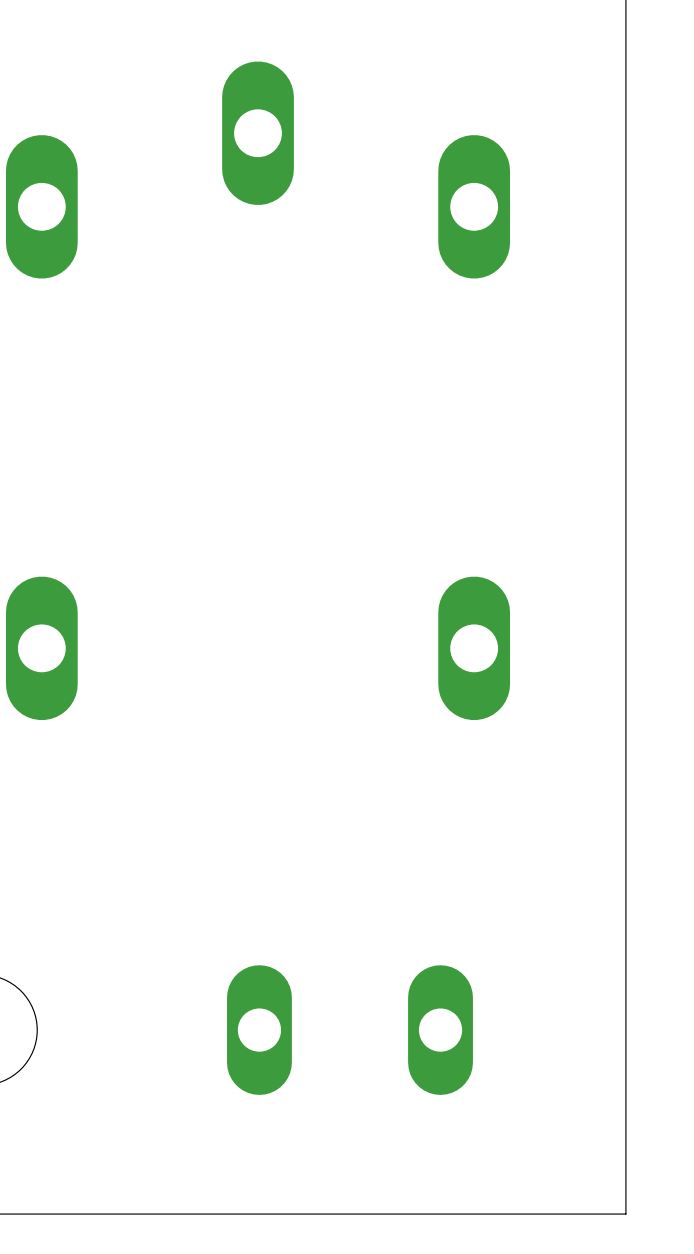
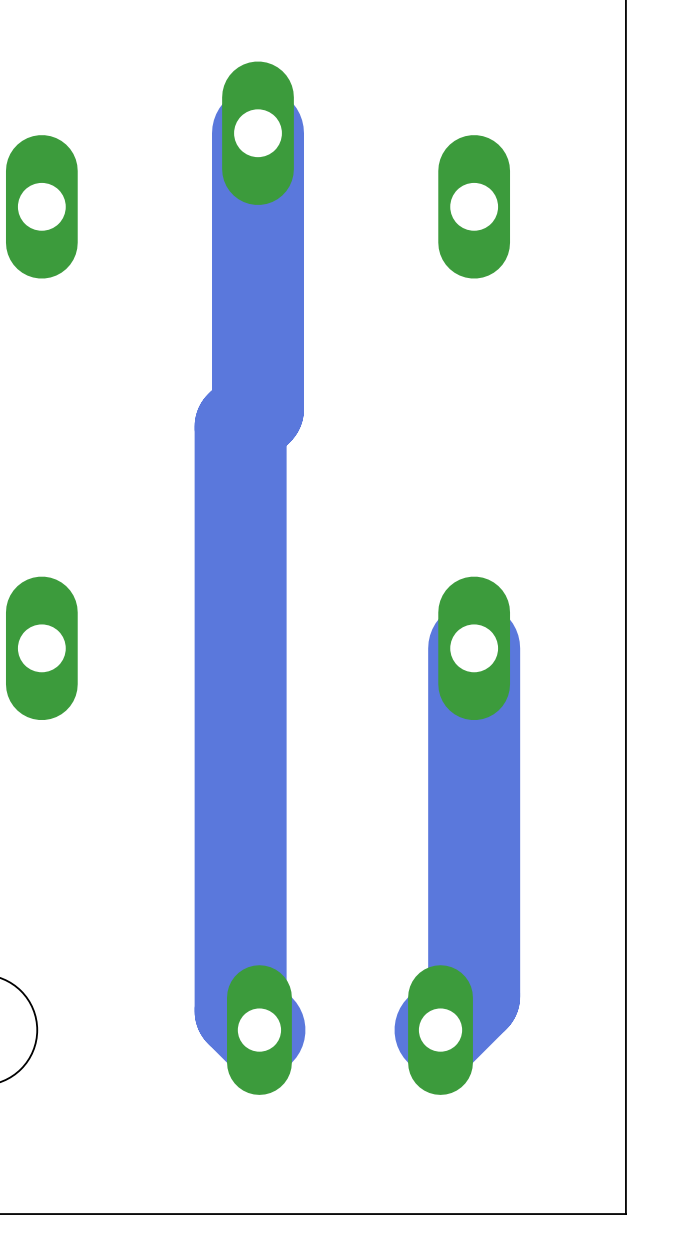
track: none -> (258, 133) (258, 409) (240, 426) (240, 1011) (259, 1030)
track: none -> (474, 648) (474, 996) (440, 1030)

